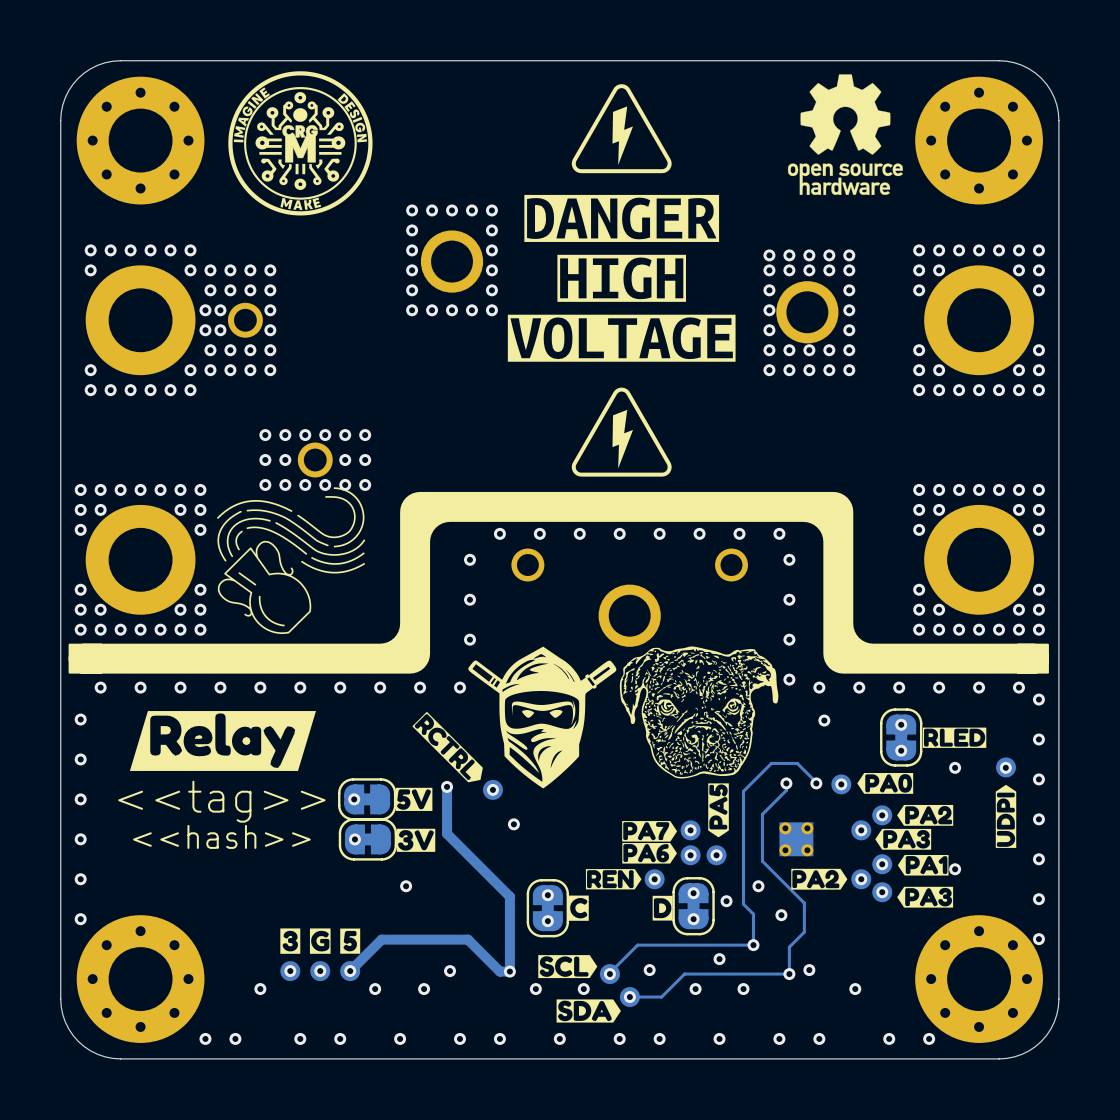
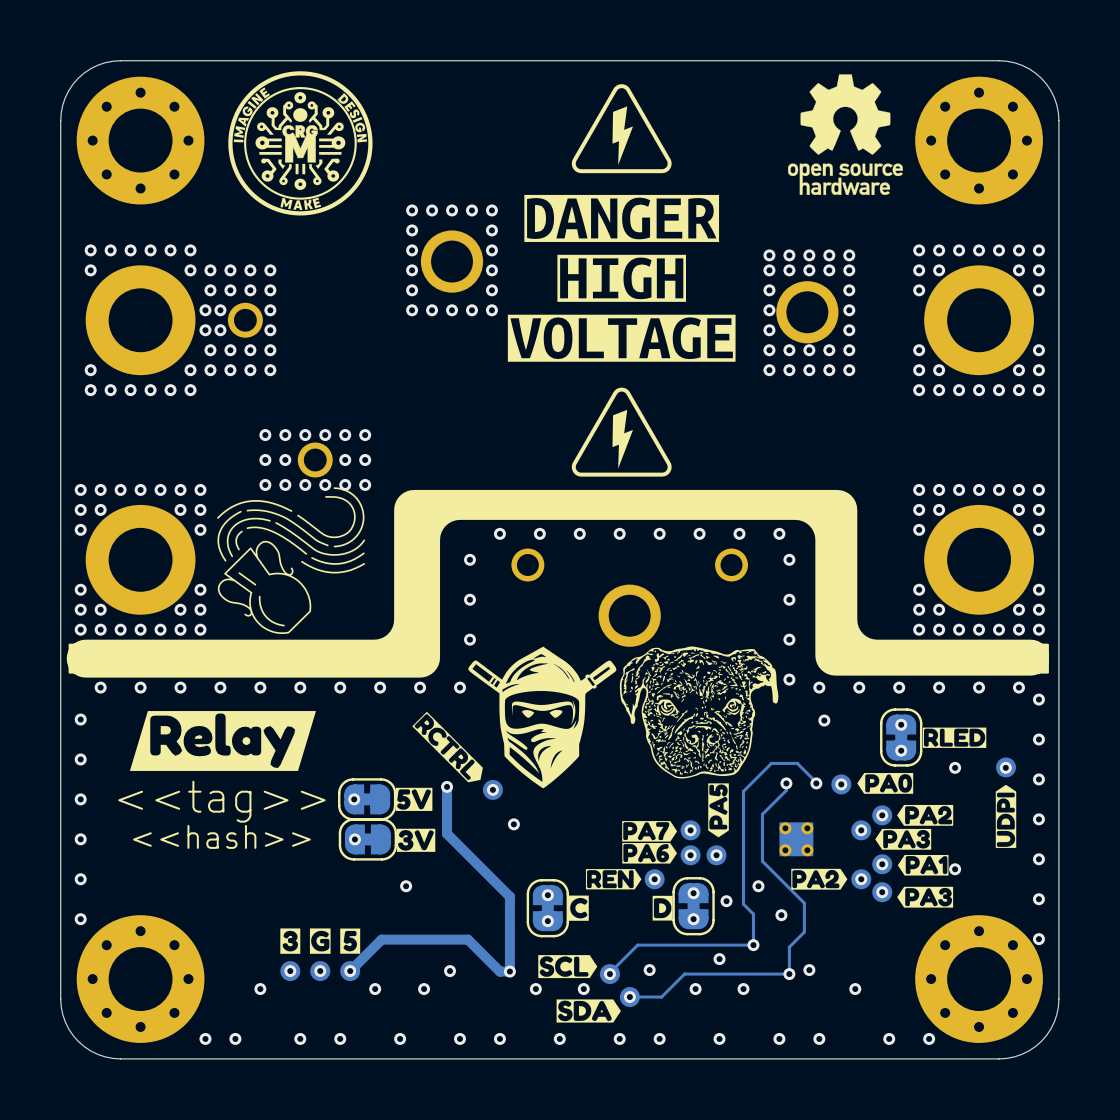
drawing shape: [68, 491, 1049, 674] -> [66, 489, 1049, 678]

